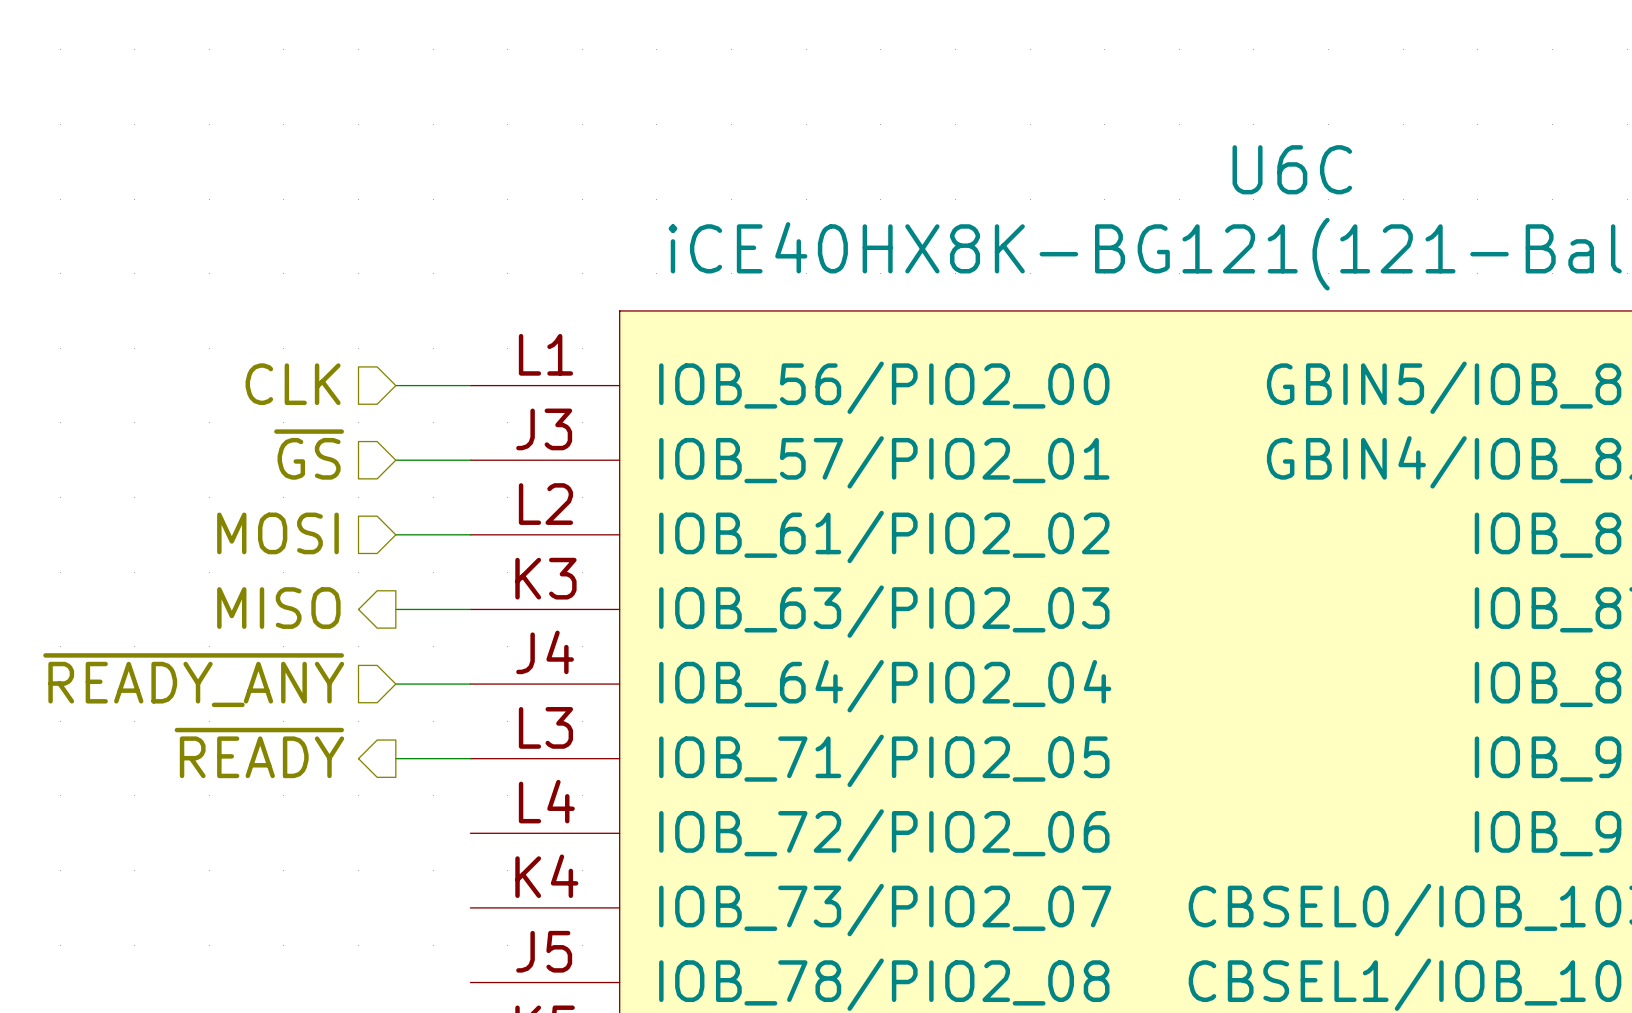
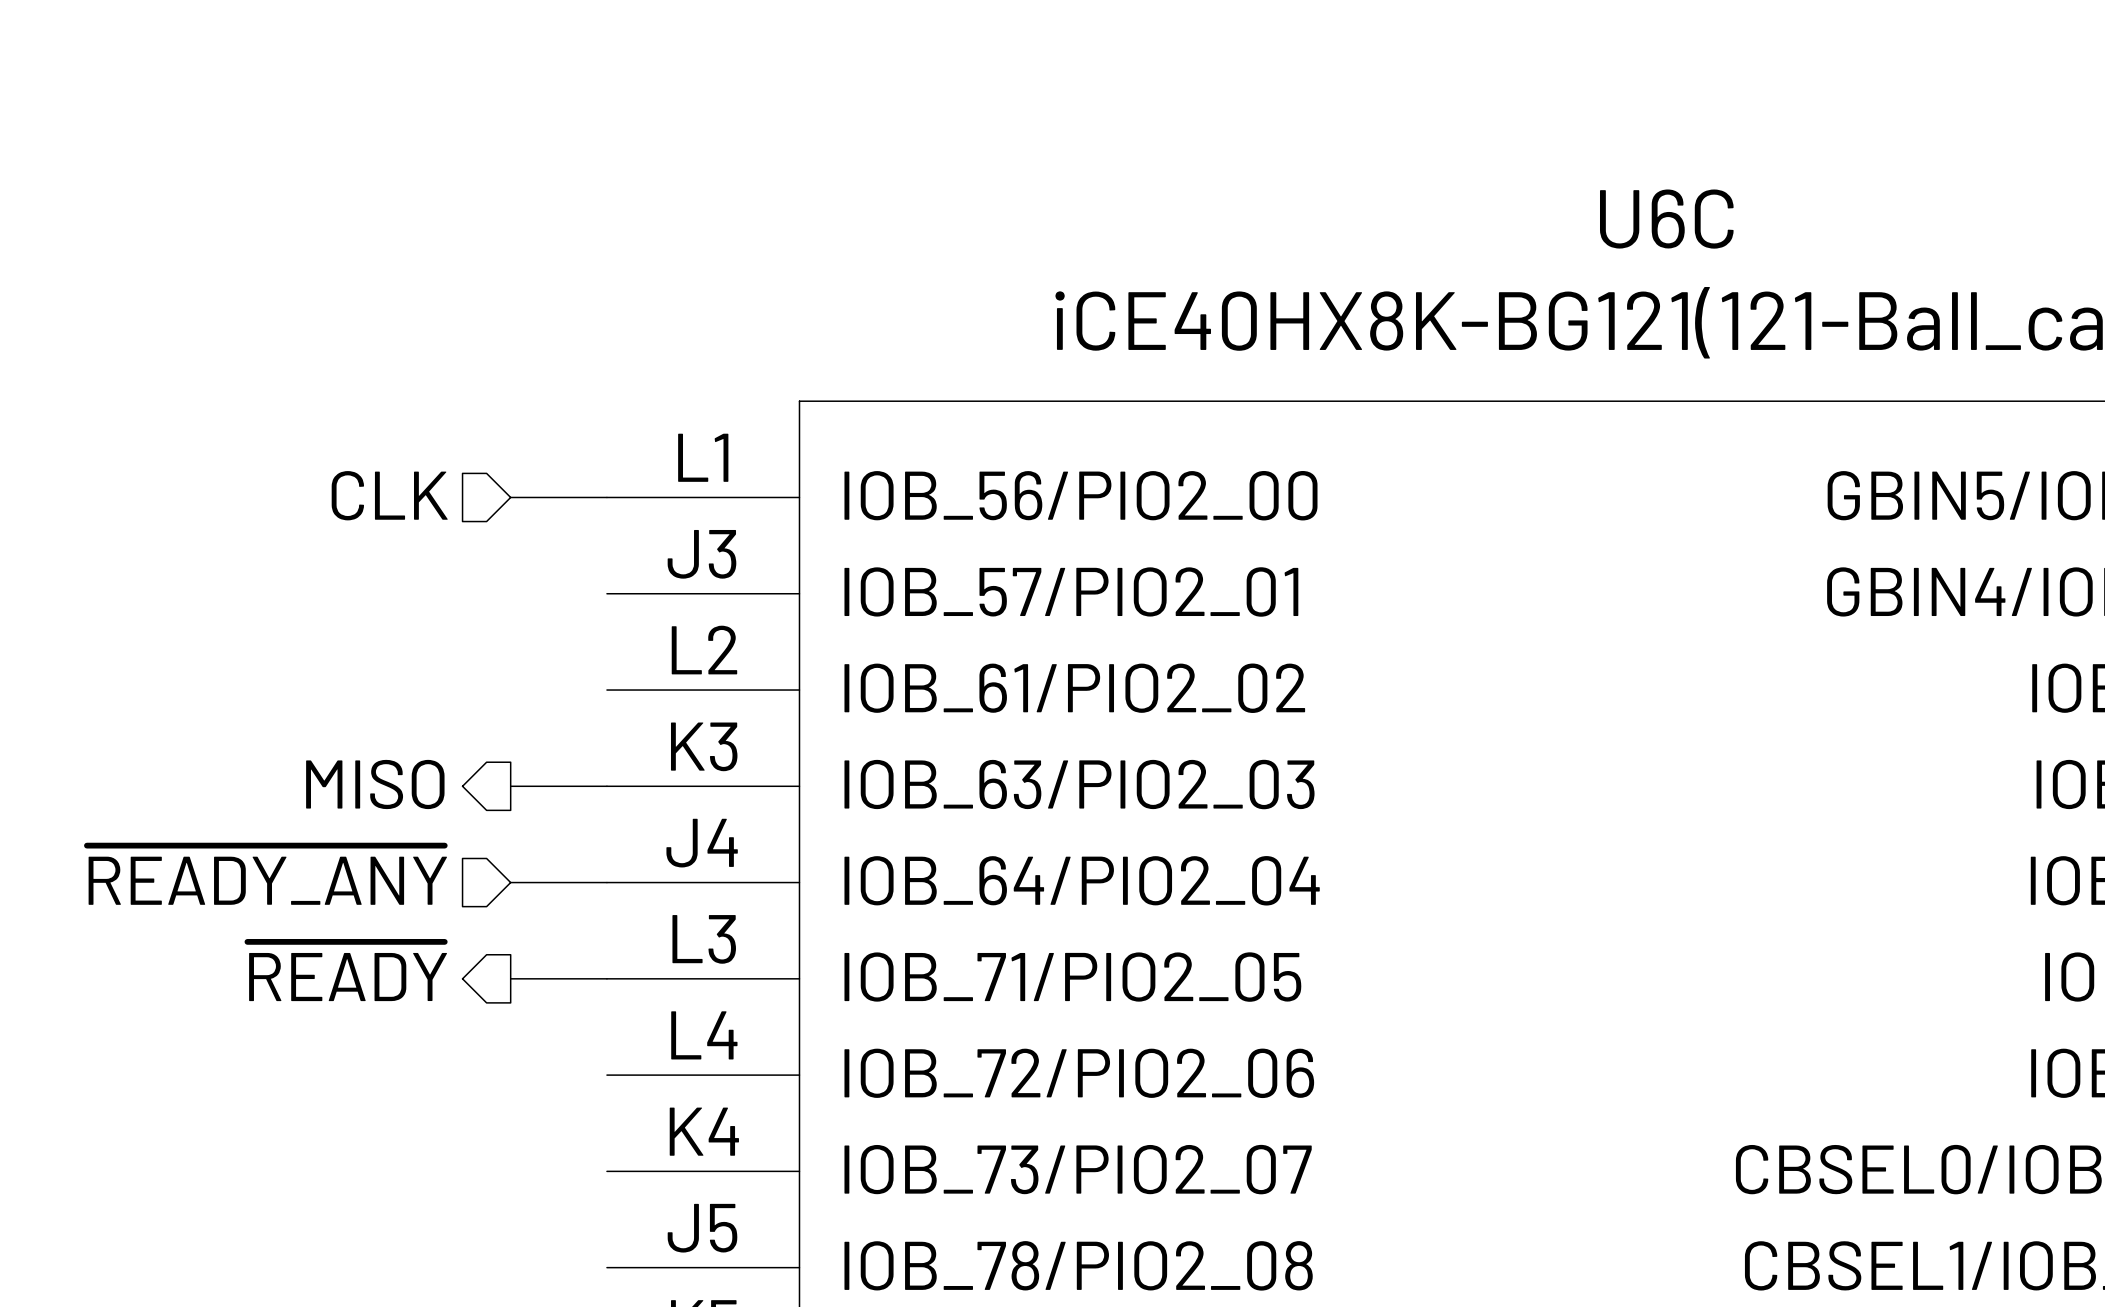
hierarchical label: ~{GS} (309, 454) -> none
wire: (395, 460) (470, 460) -> none
hierarchical label: MOSI (277, 533) -> none
wire: (395, 534) (470, 534) -> none

